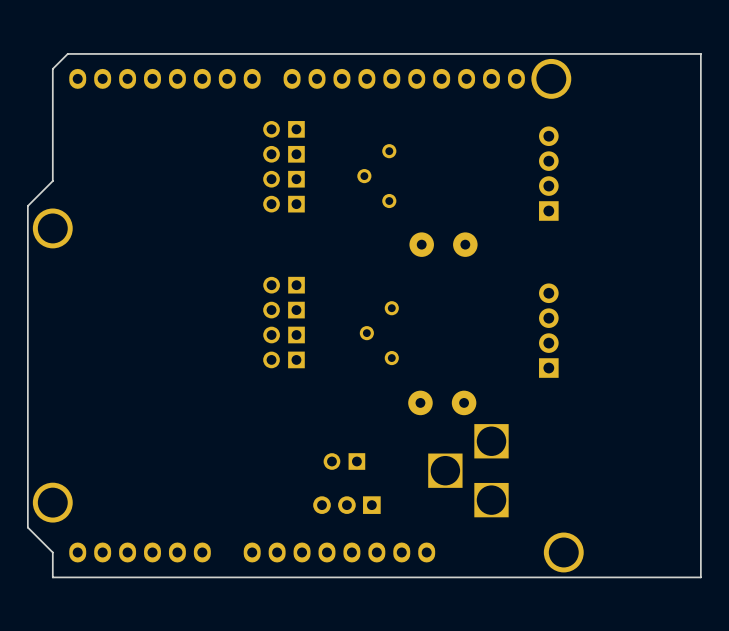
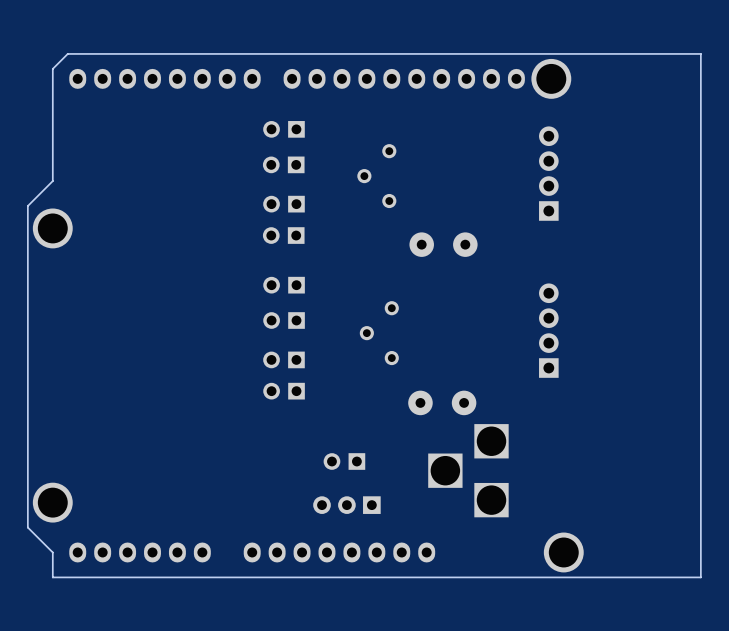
part: (283, 154) -> none
part: none -> (283, 164)
part: (283, 179) -> none
part: none -> (283, 235)
part: (283, 310) -> none
part: none -> (284, 320)
part: (284, 335) -> none
part: none -> (284, 391)

